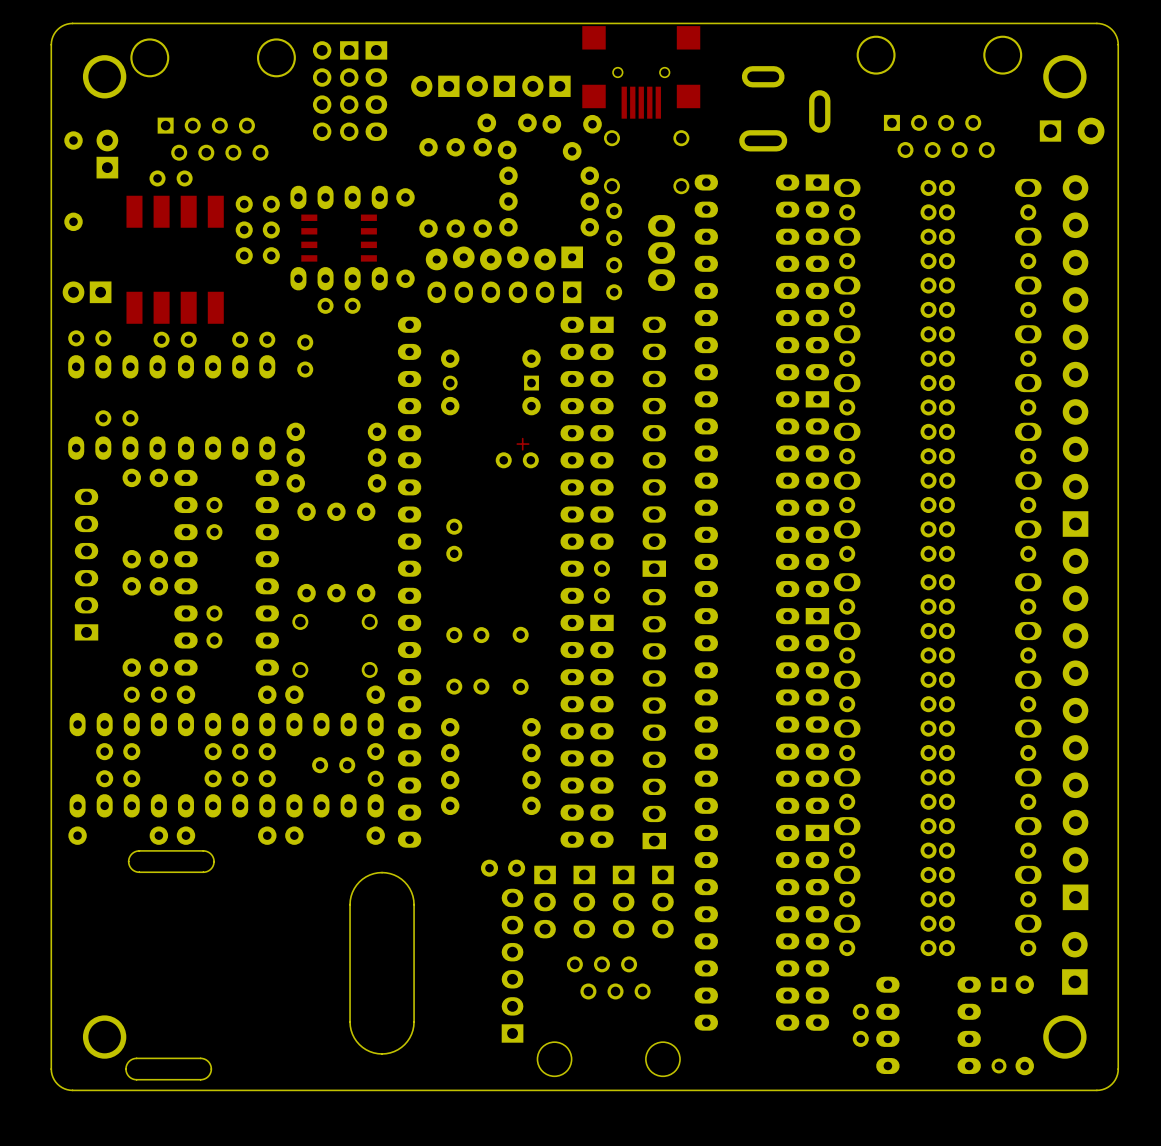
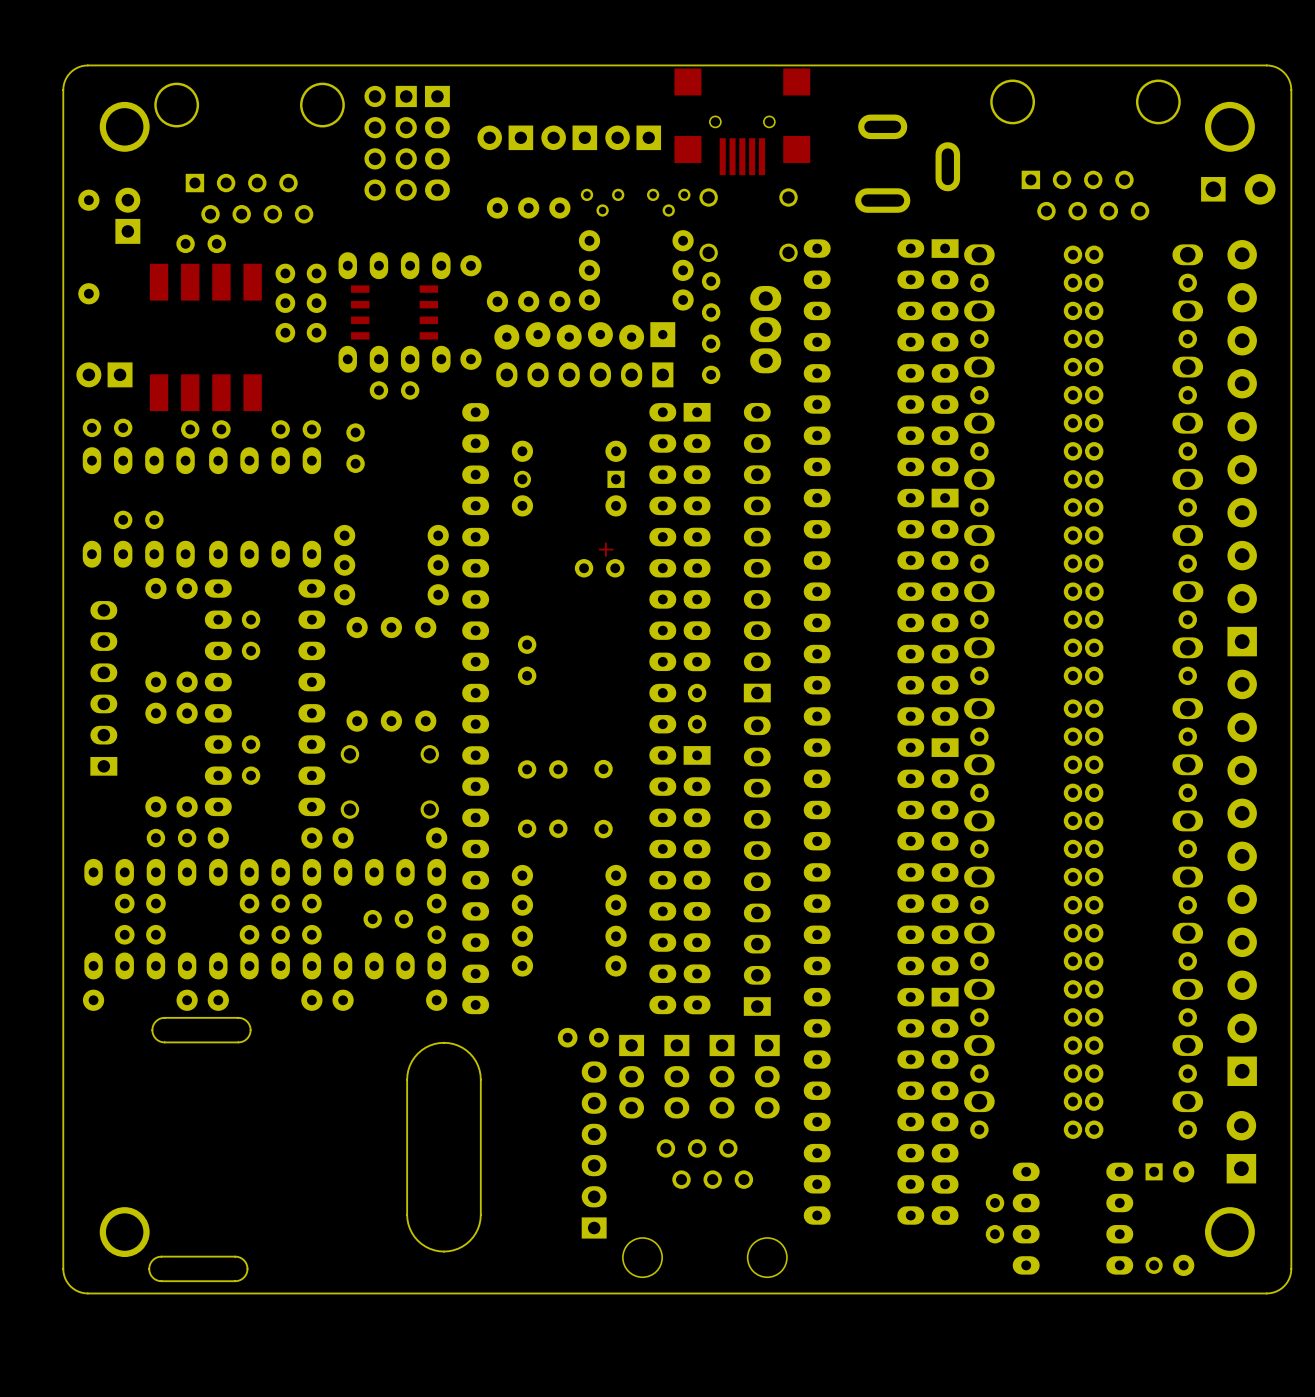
part footprint: [542, 114, 602, 161] -> [646, 188, 691, 217]
part: (507, 136) -> none
part: none -> (602, 202)

